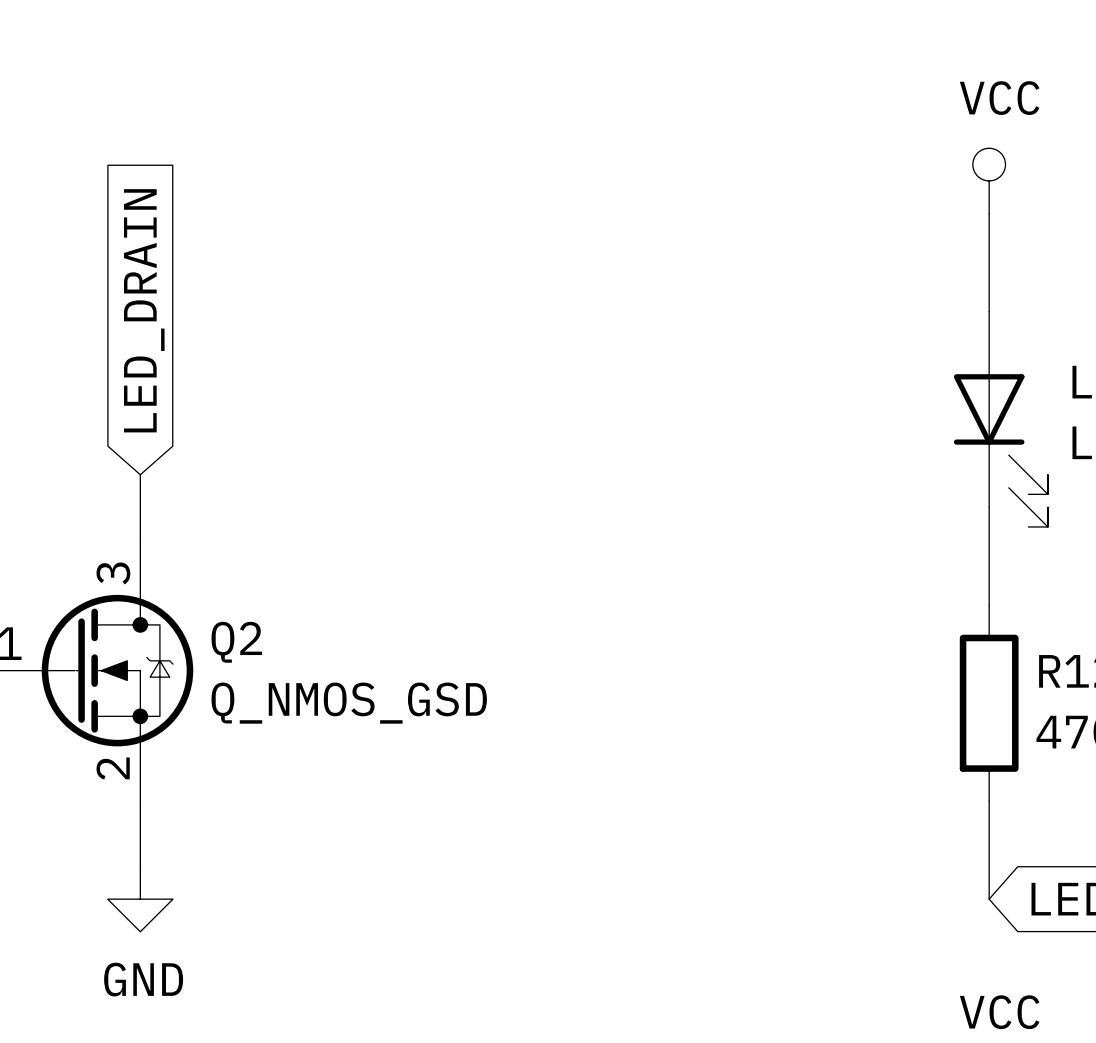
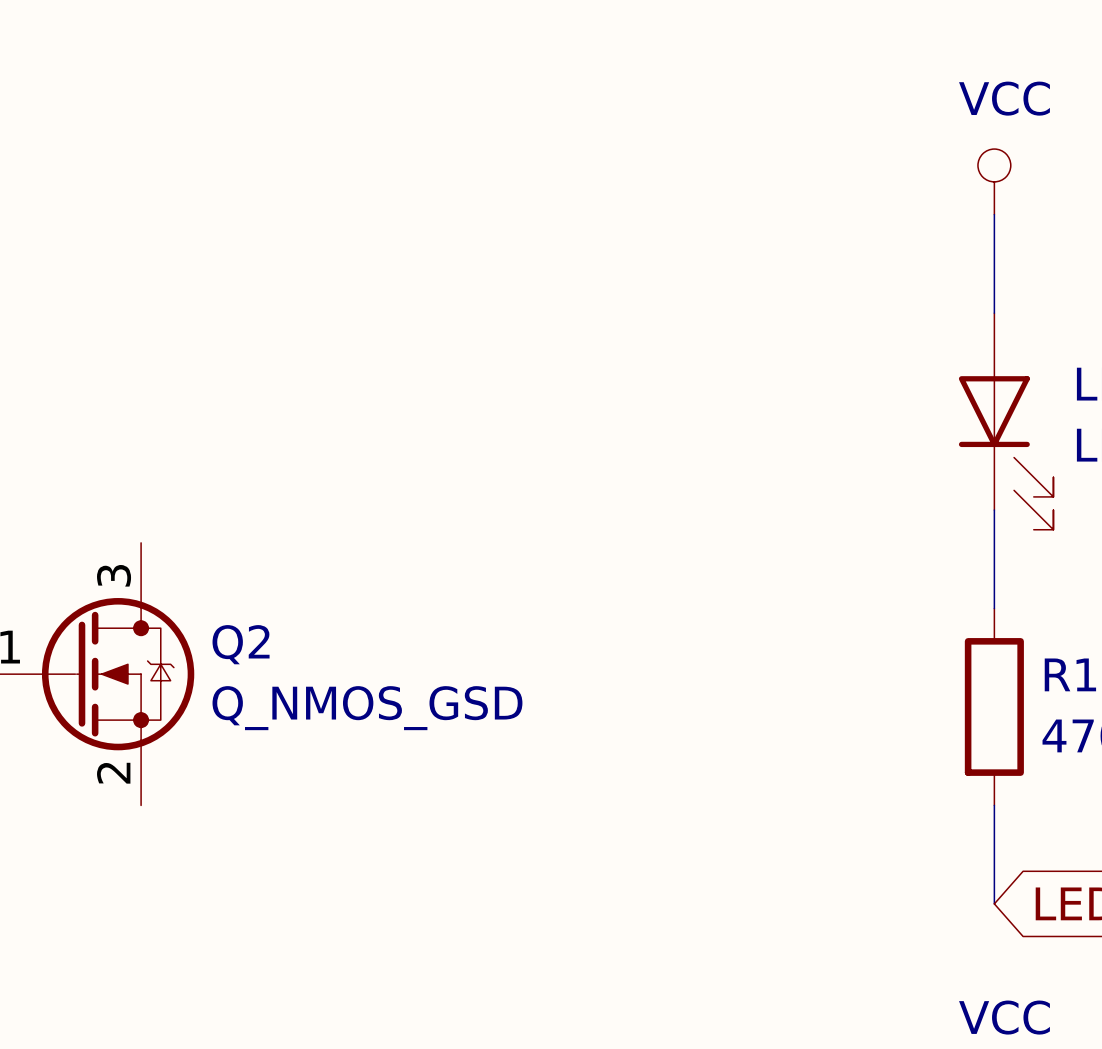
global label: LED_DRAIN (144, 310) -> none
wire: (140, 474) (140, 540) -> none
wire: (140, 801) (140, 866) -> none
power symbol: GND (140, 899) -> none

